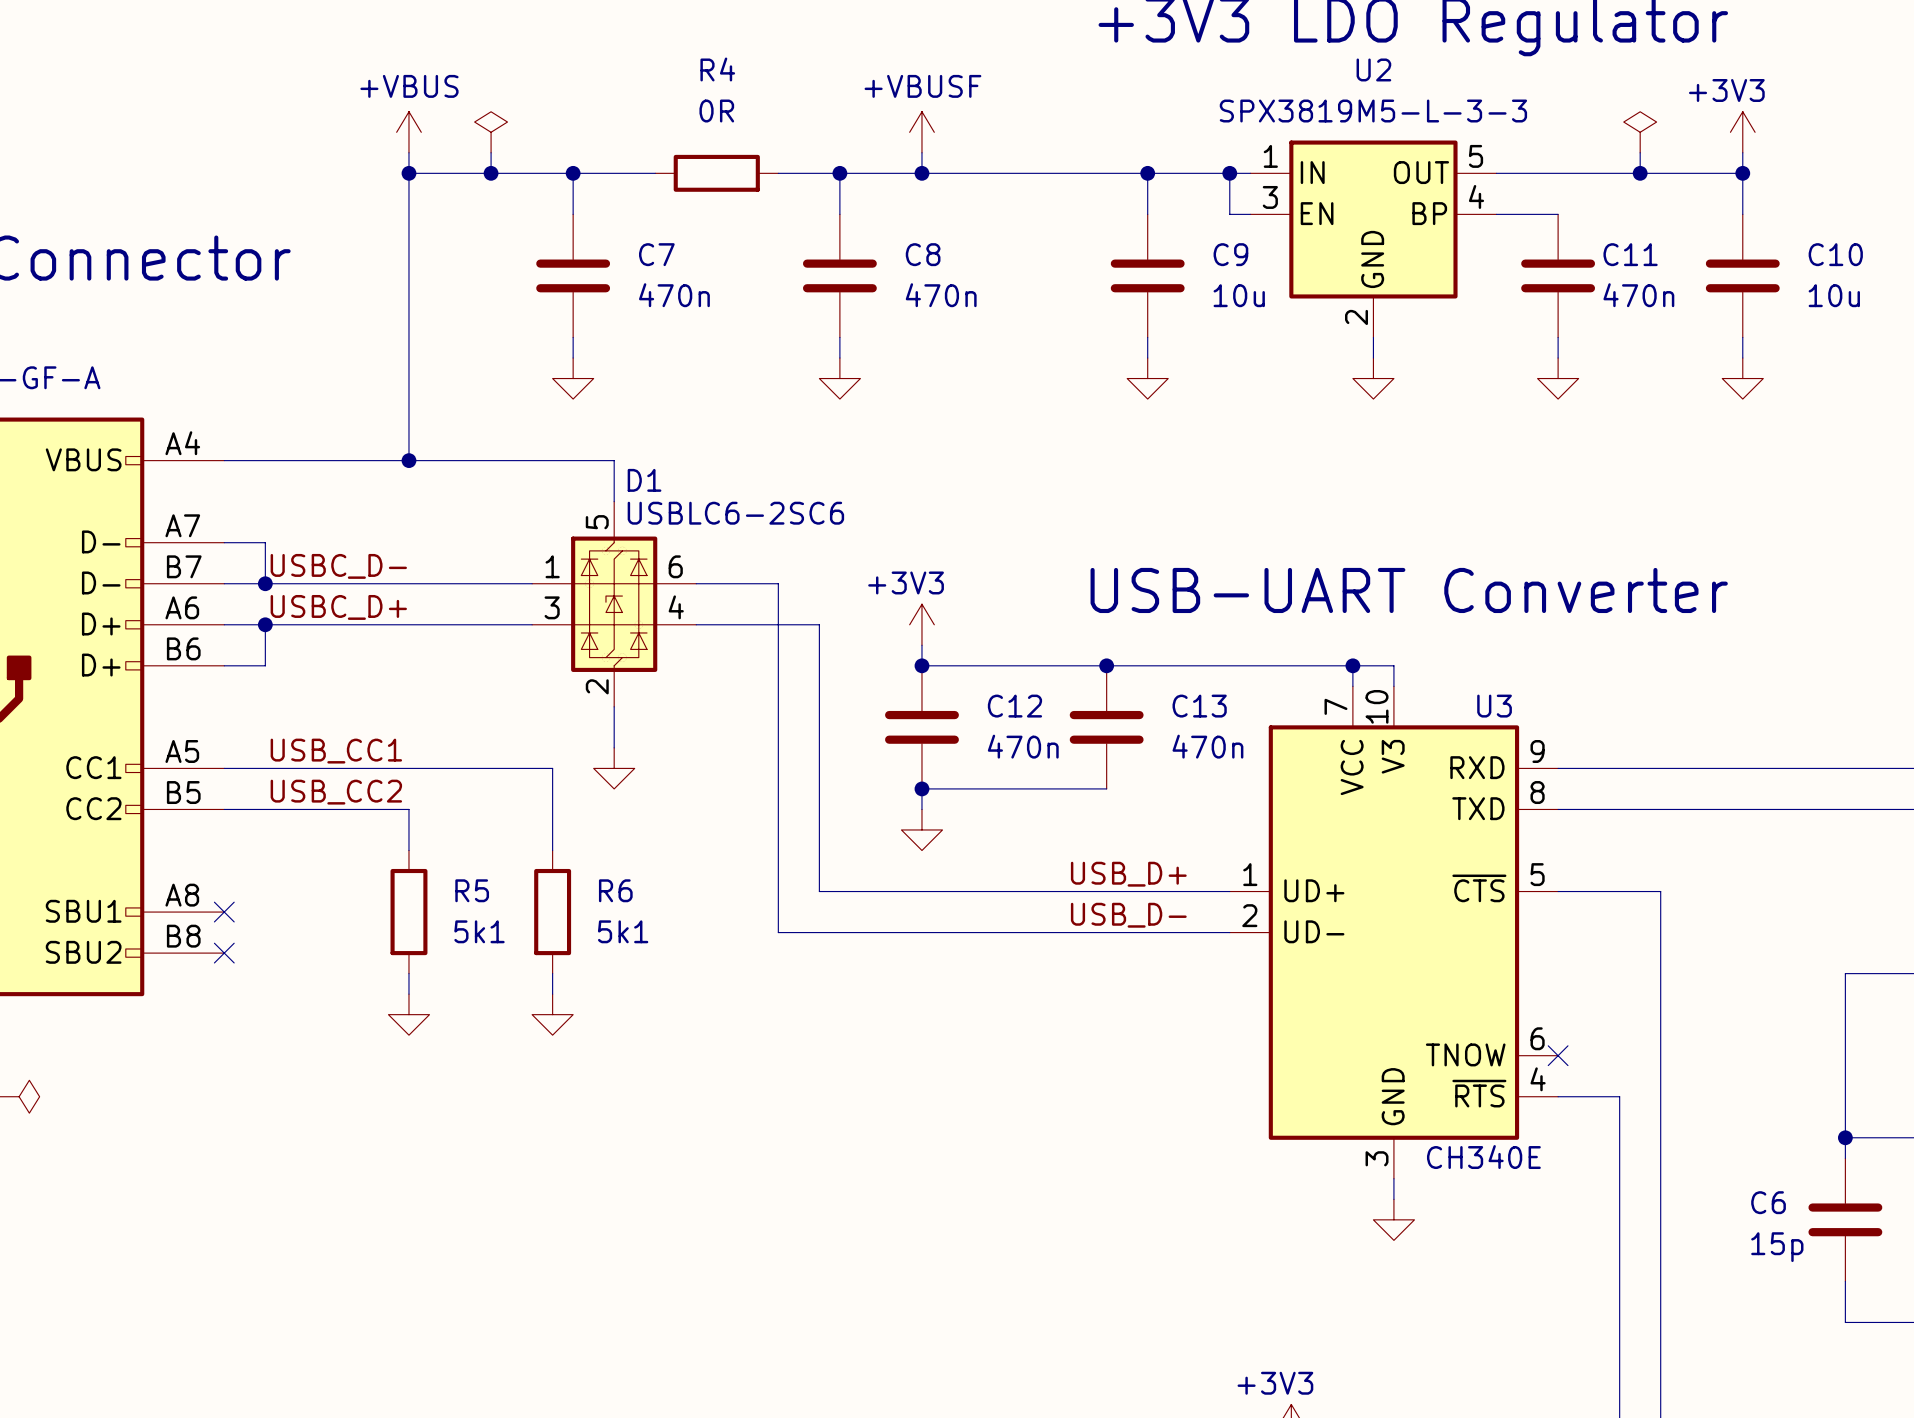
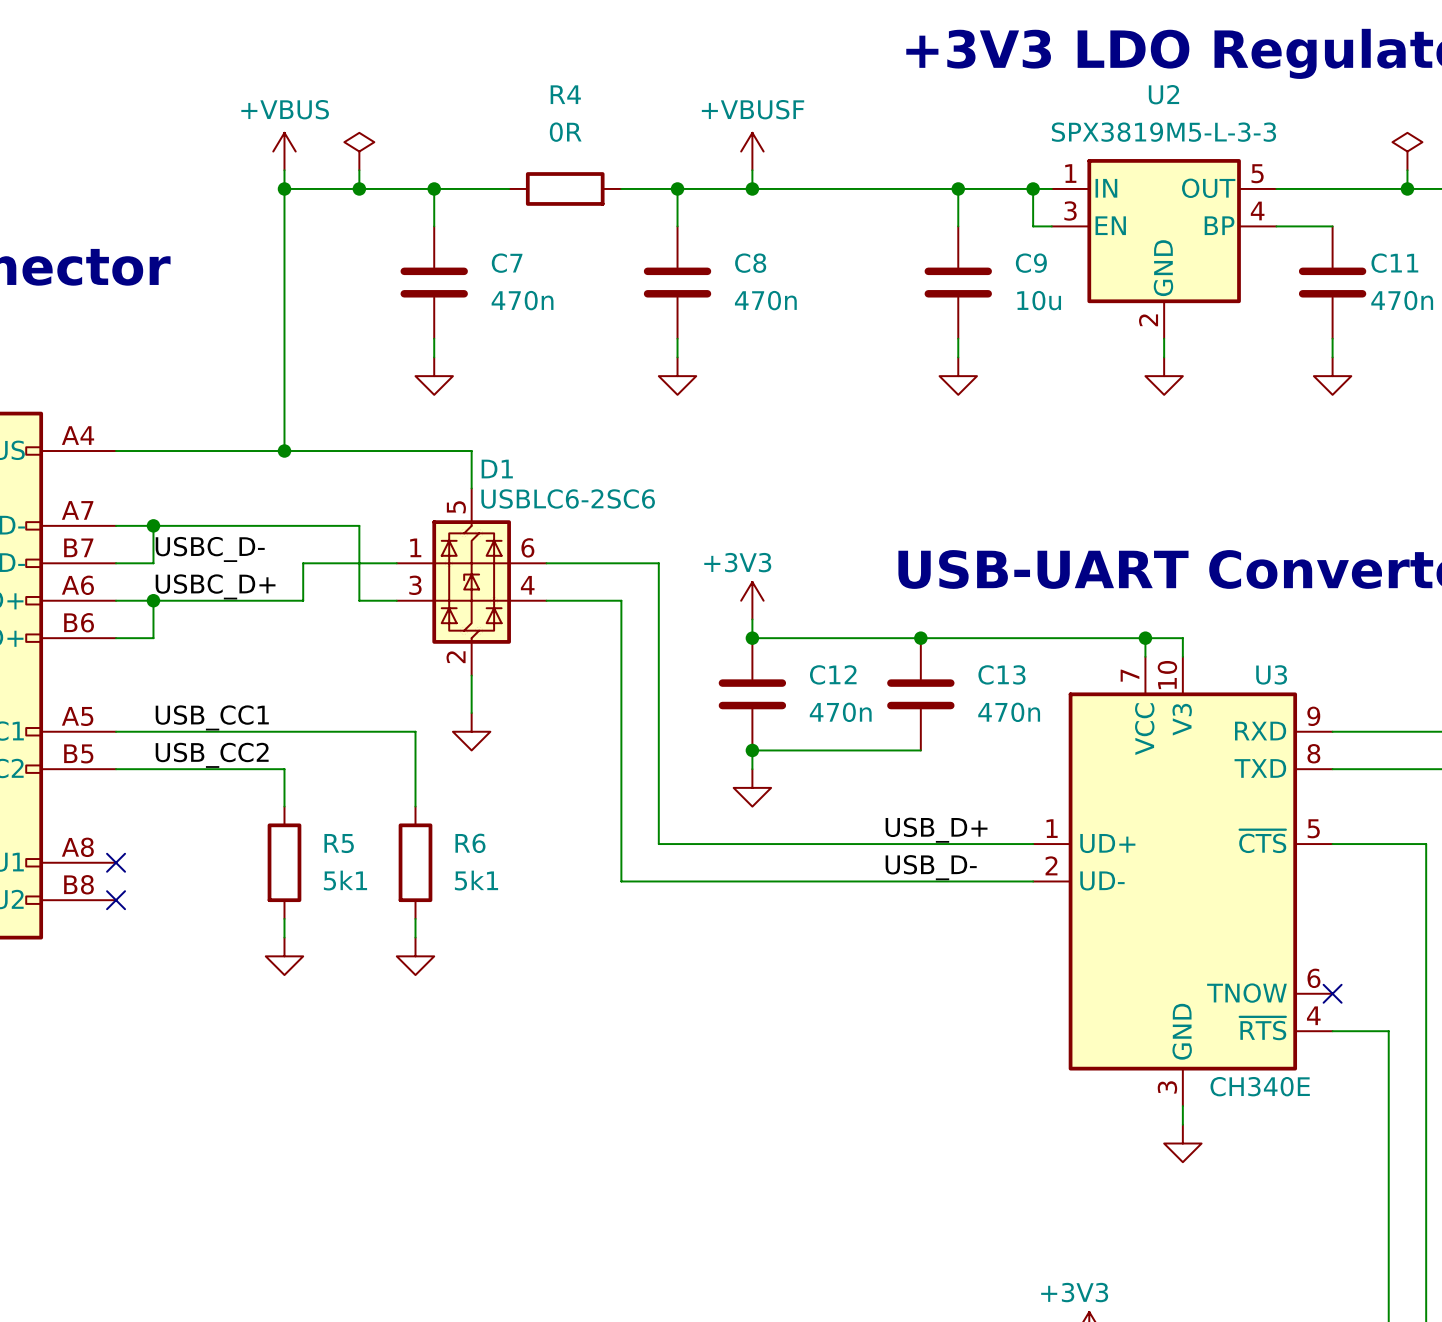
wire: none -> (153, 525) (359, 525) (359, 600)
wire: (265, 583) (429, 583) -> none
junction position: (265, 583) -> (153, 525)
wire: (778, 583) (778, 624) (819, 624) -> (621, 563) (658, 563) (658, 600)
wire: (429, 624) (491, 624) -> (303, 600) (303, 563)

